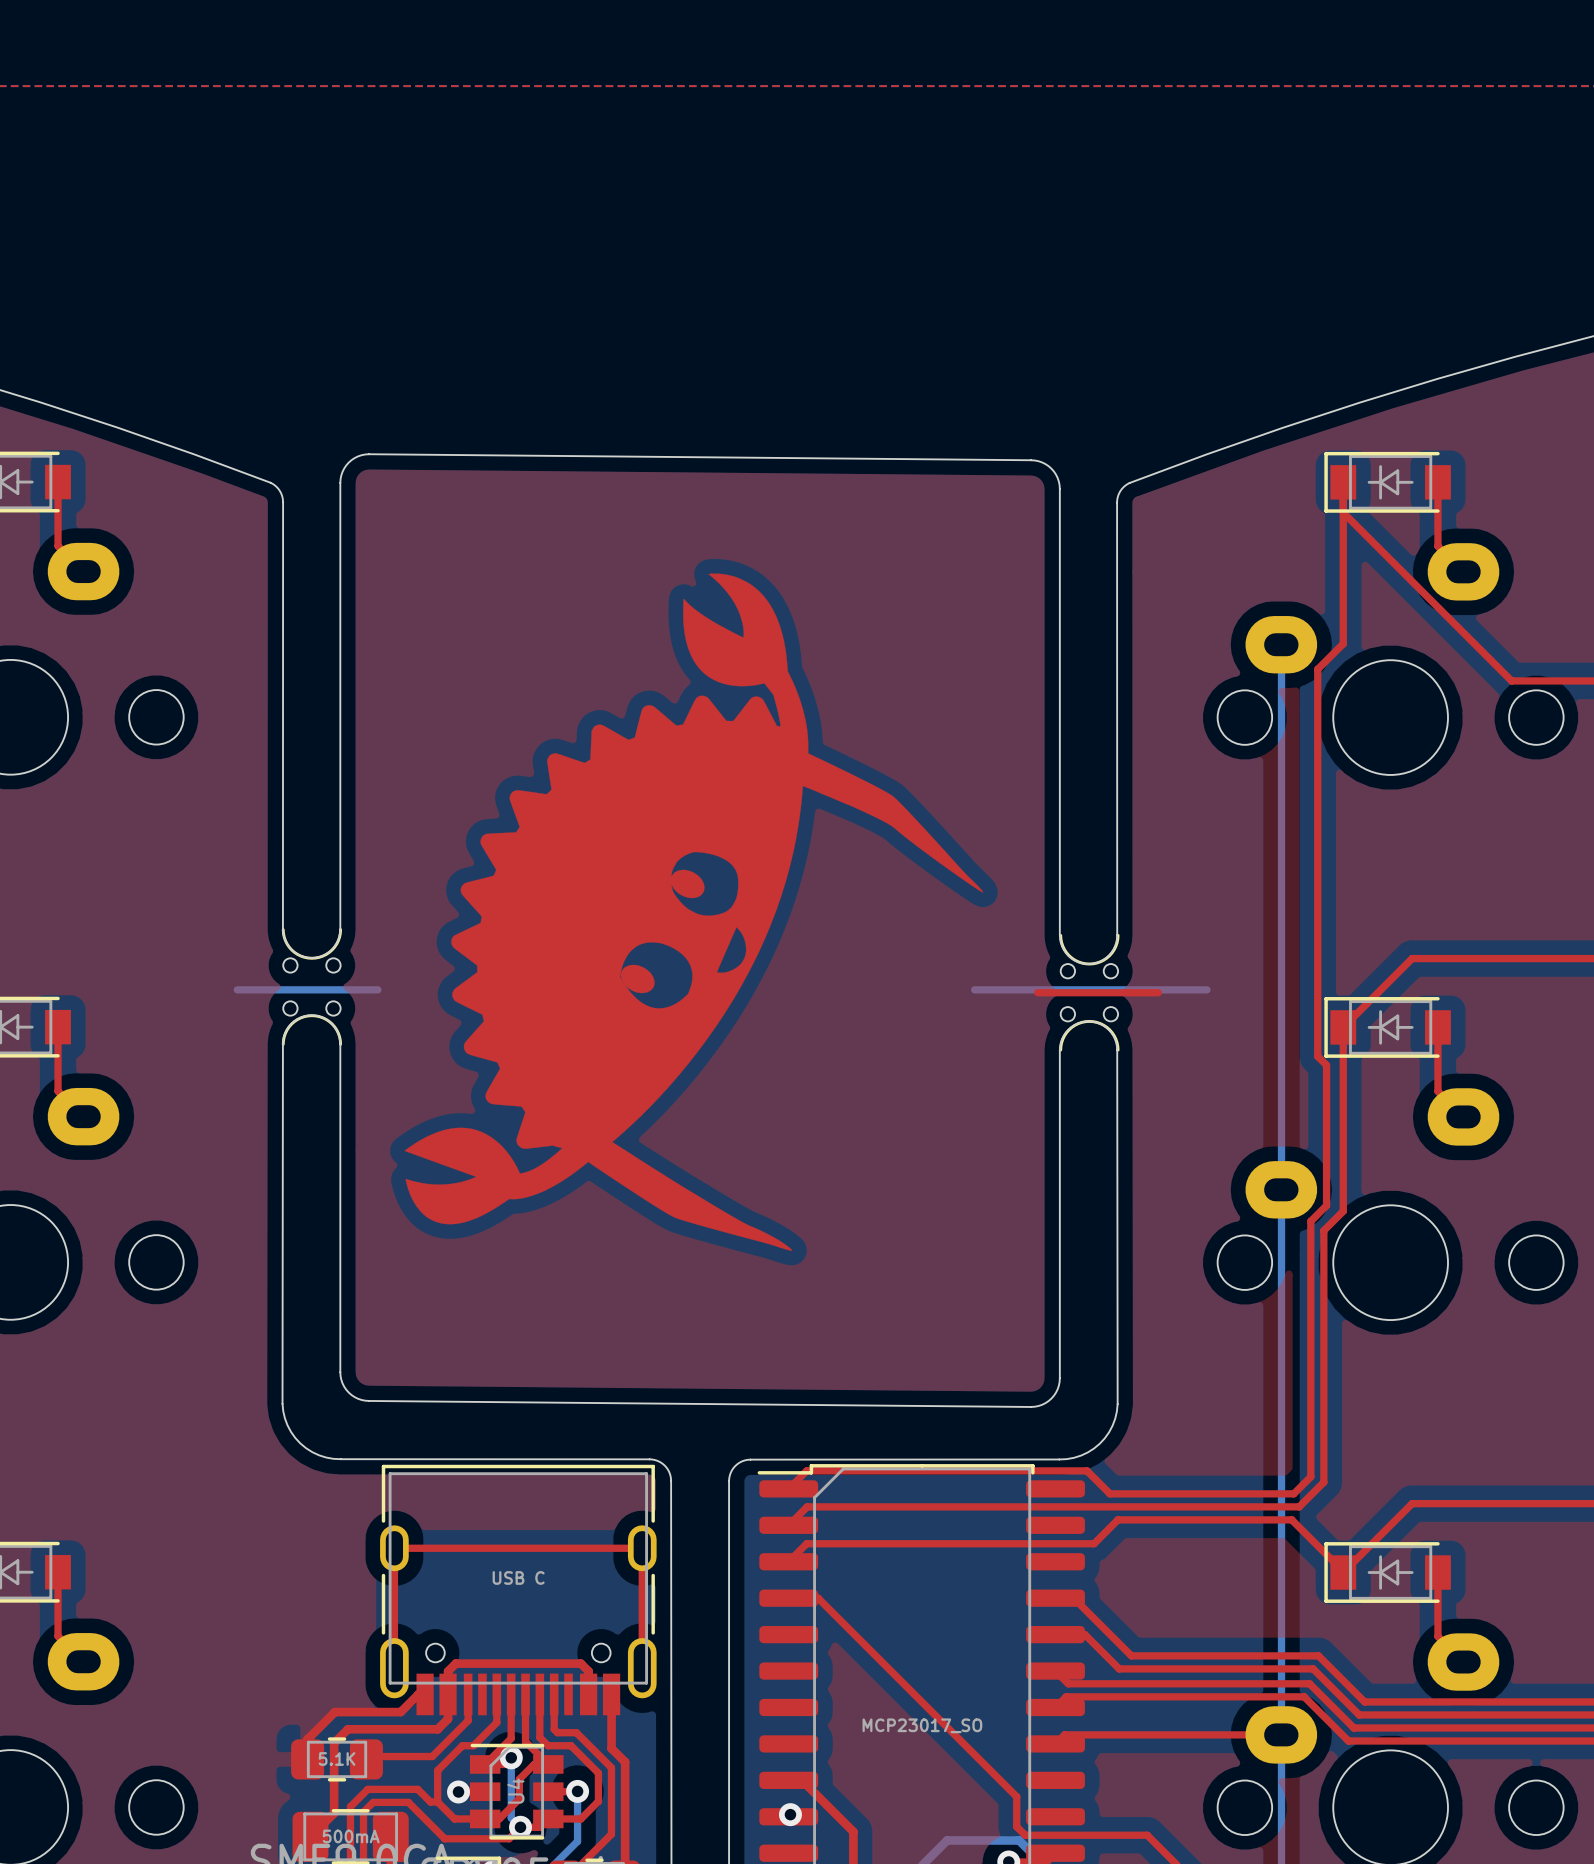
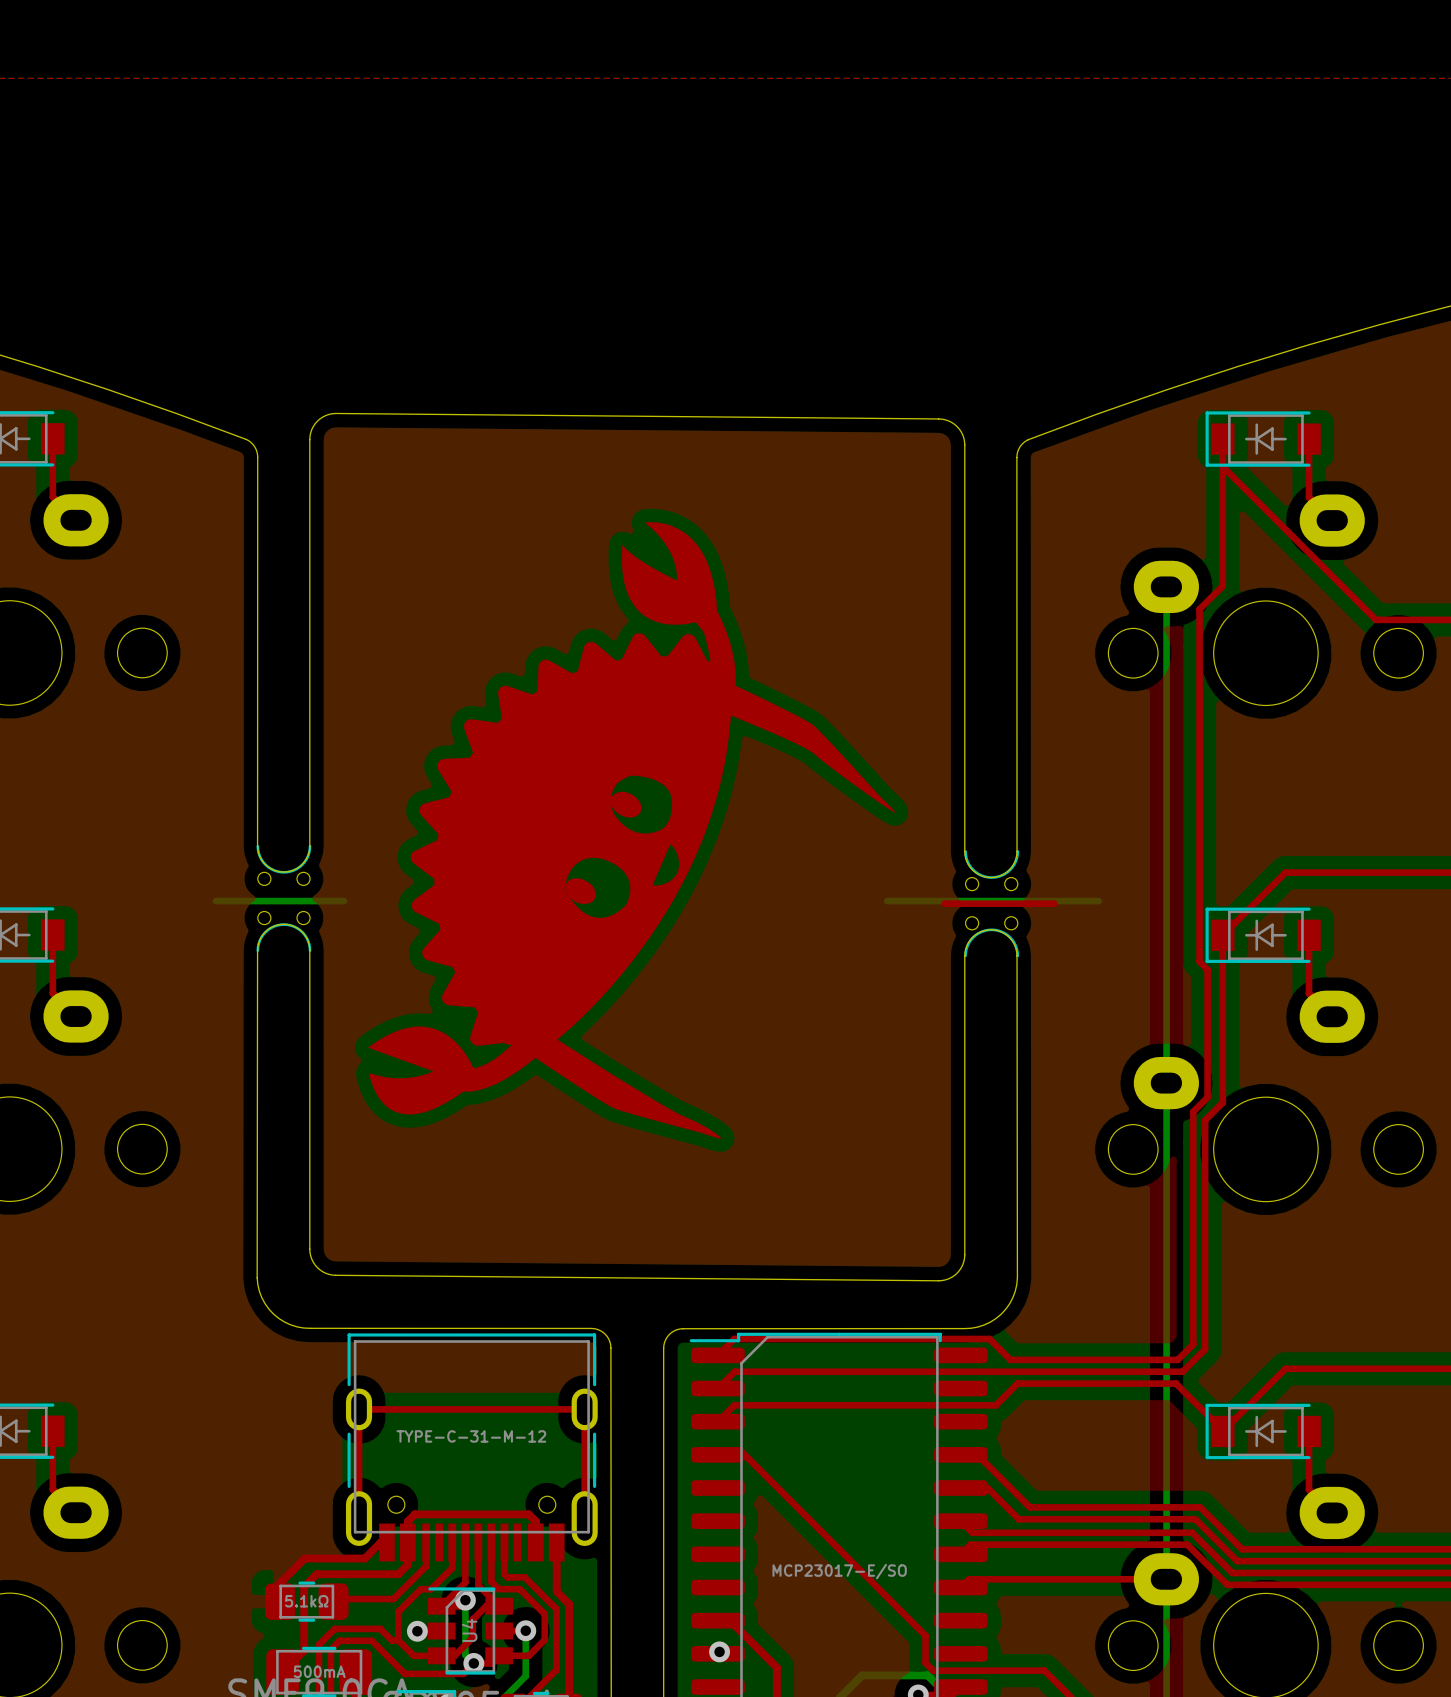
part value: USB C (518, 1577) -> TYPE-C-31-M-12 (471, 1436)
part value: MCP23017_SO (922, 1725) -> MCP23017-E/SO (839, 1571)
part value: 5.1K (337, 1758) -> 5.1kΩ (306, 1601)

